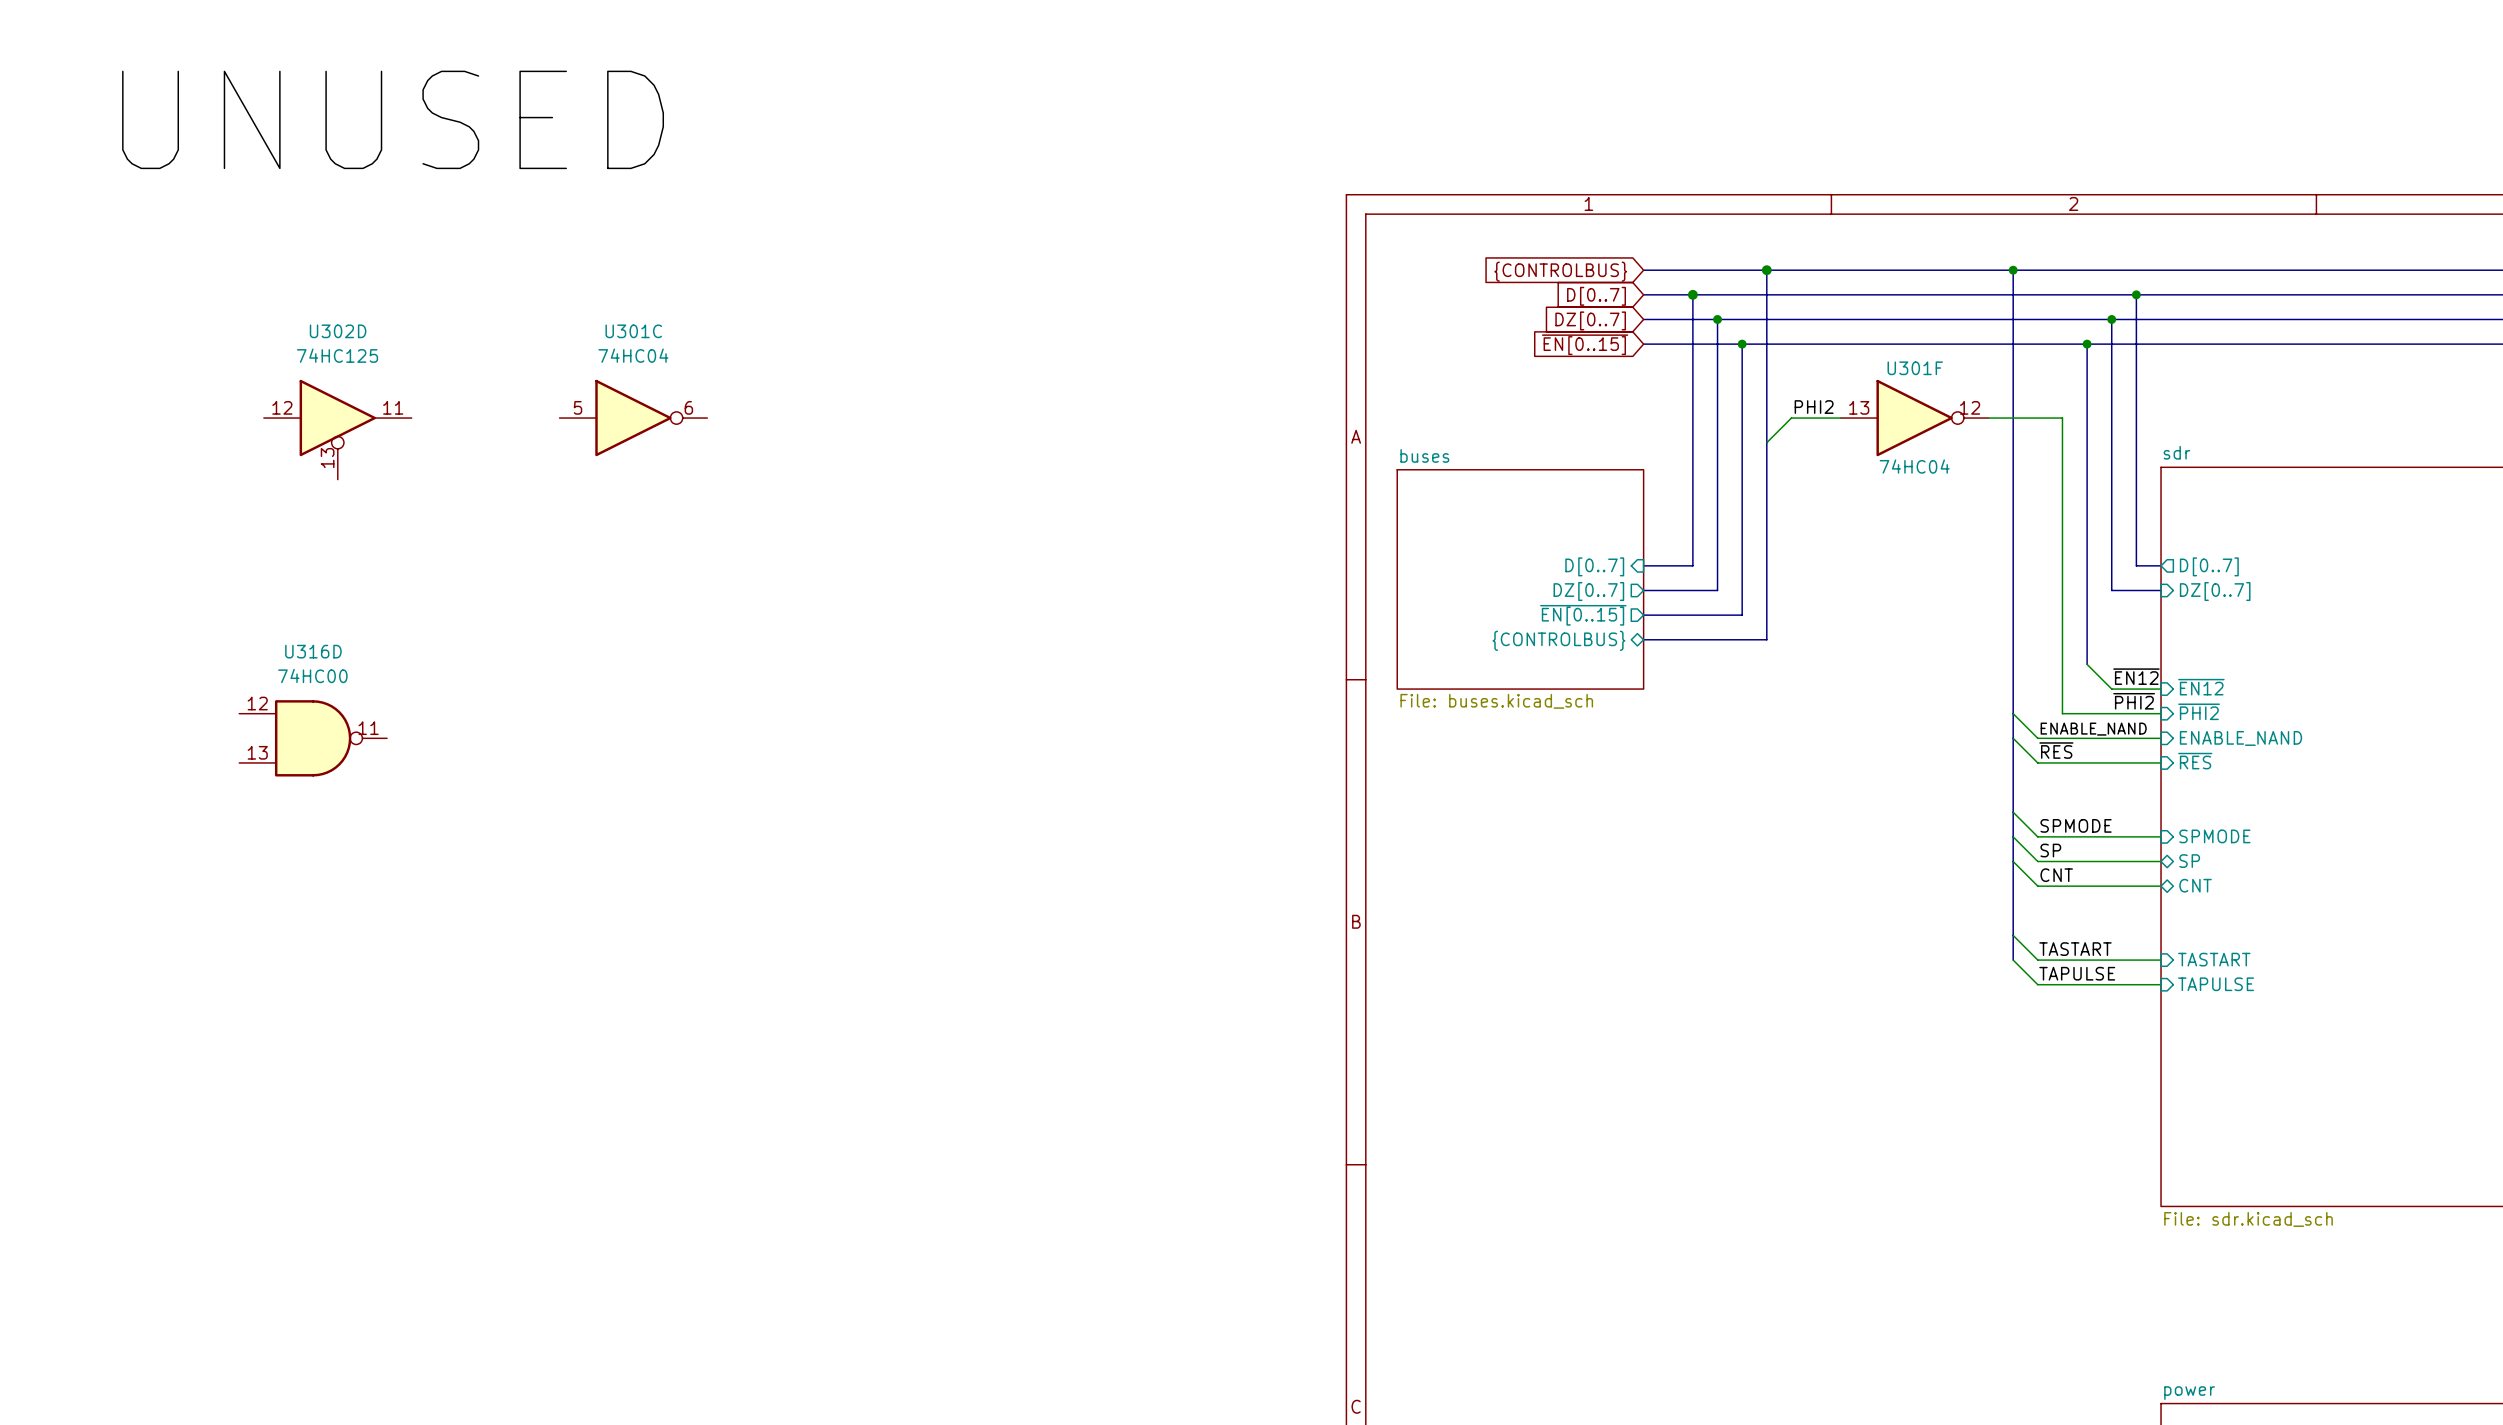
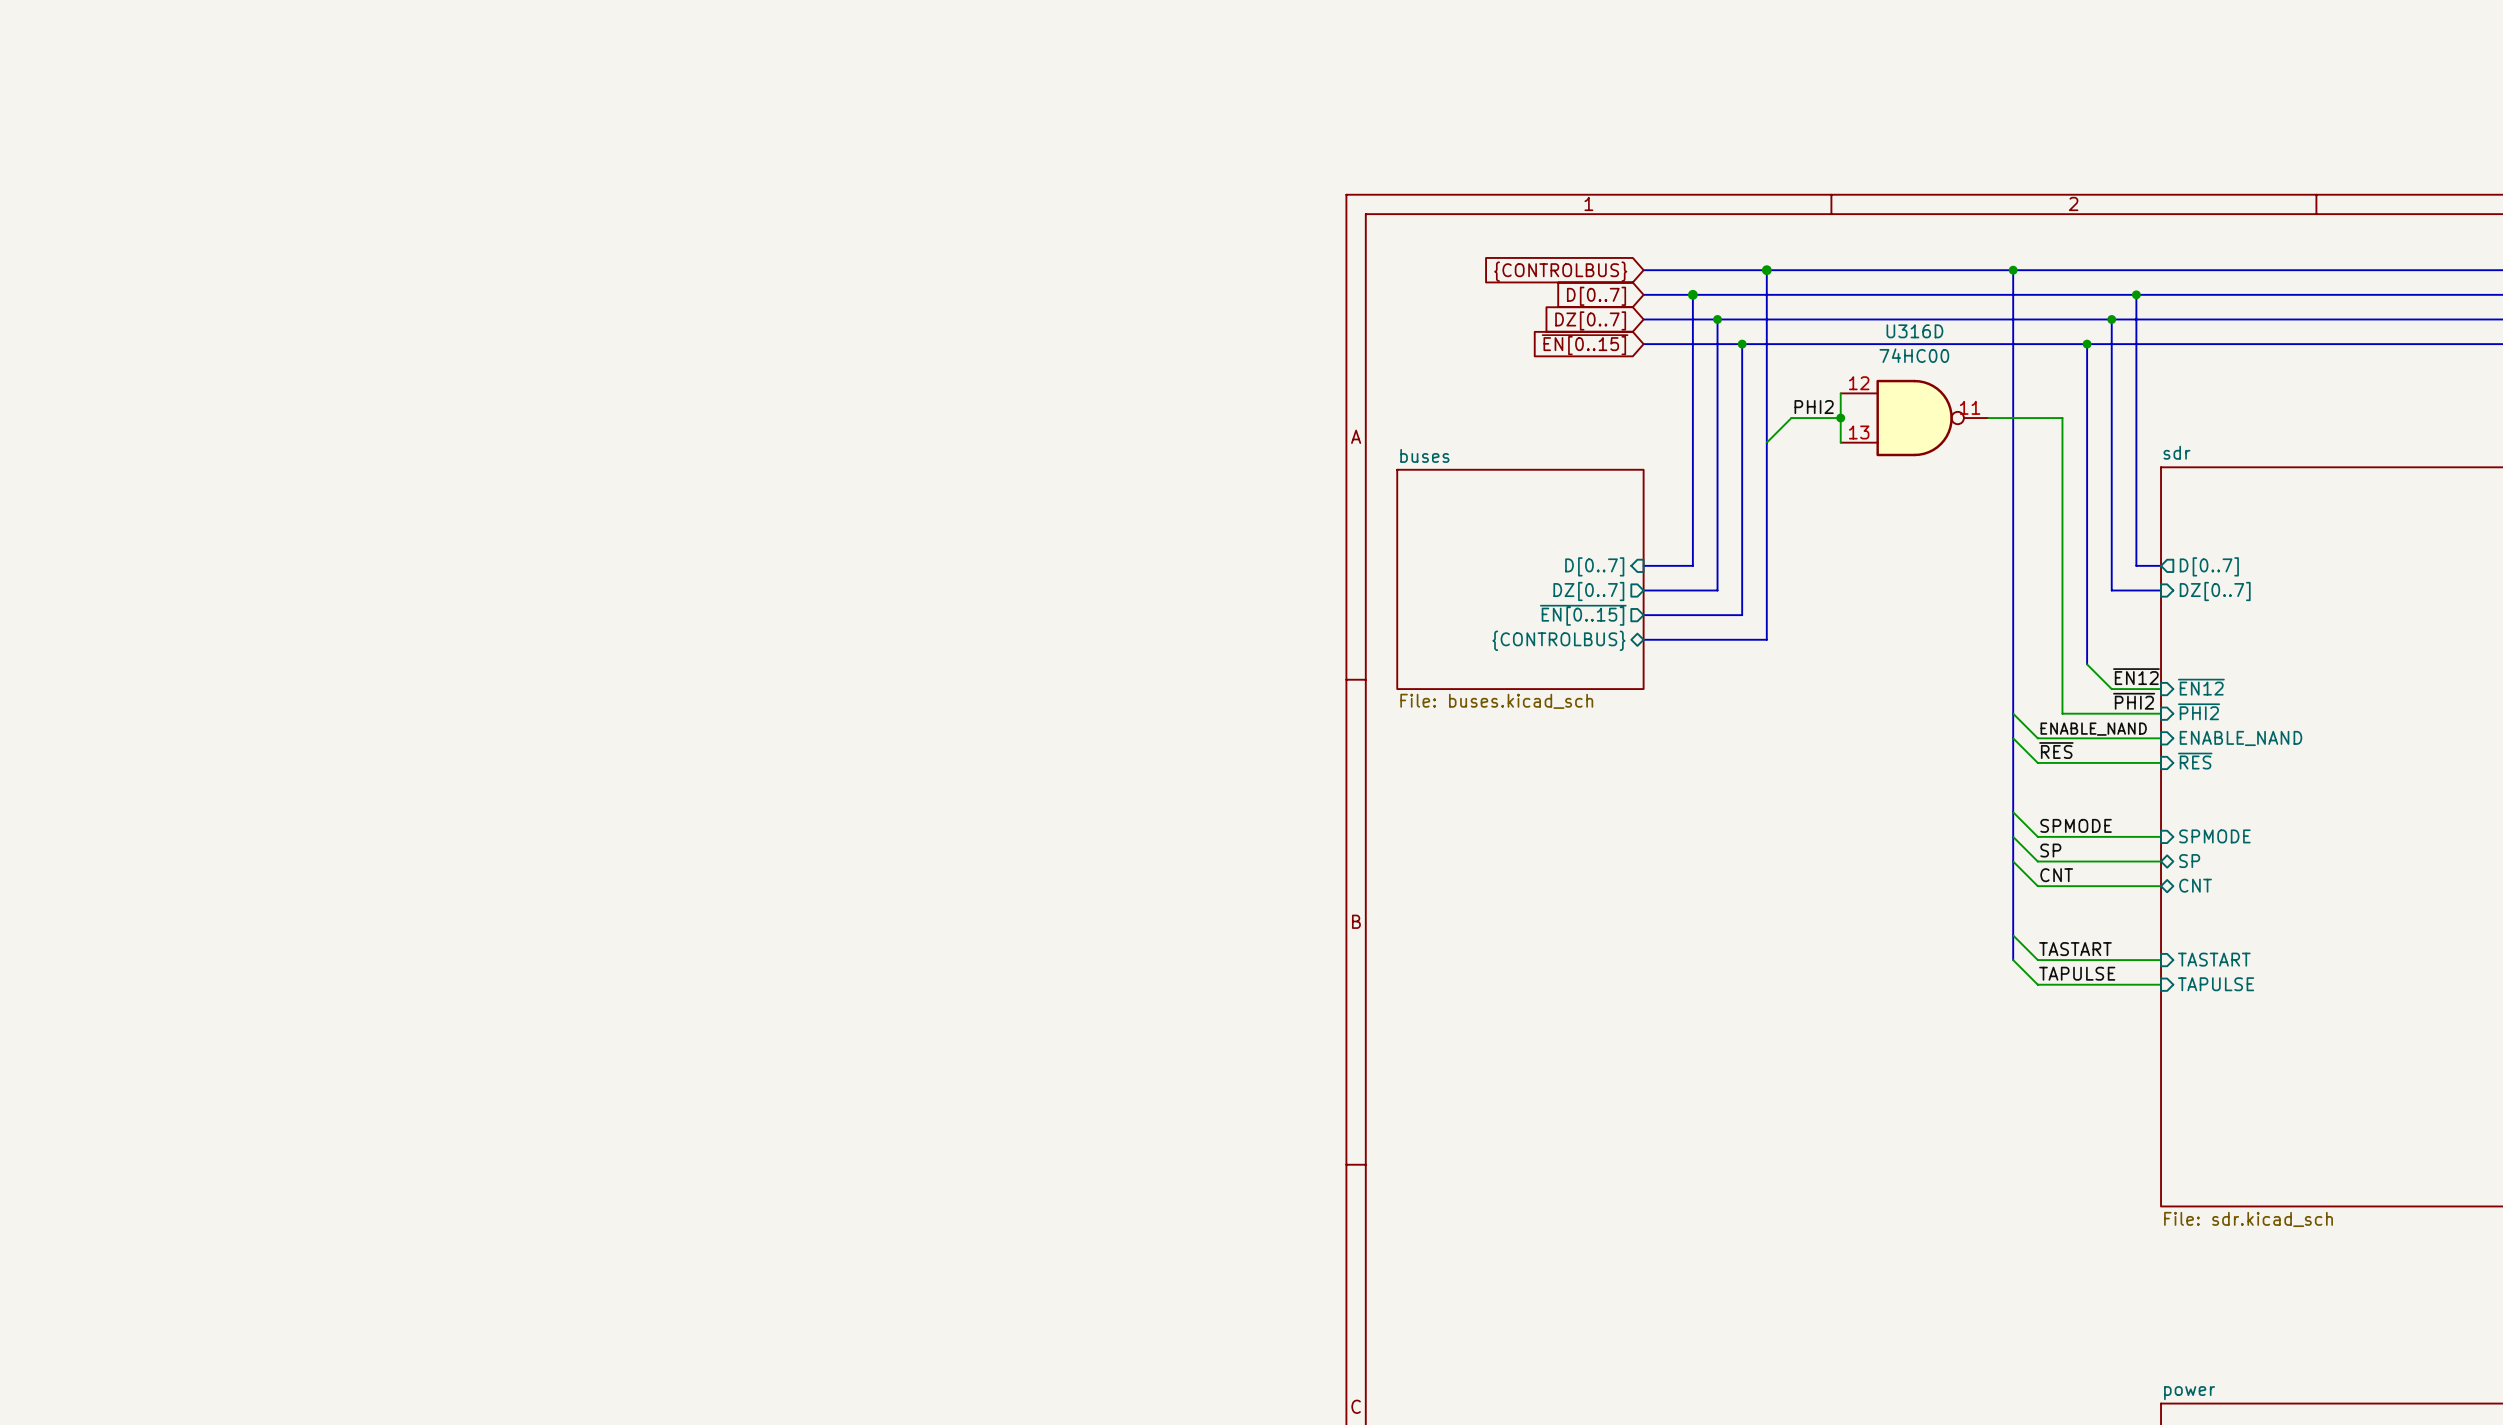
label: UNUSED (393, 119) -> none
wire: none -> (1840, 393) (1840, 442)
U301C: 74HC04 (633, 418) -> none
junction: none -> (1840, 418)
U301F: 74HC04 (1914, 418) -> none
U302D: 74HC125 (337, 429) -> none
U316D position: (313, 738) -> (1914, 418)

